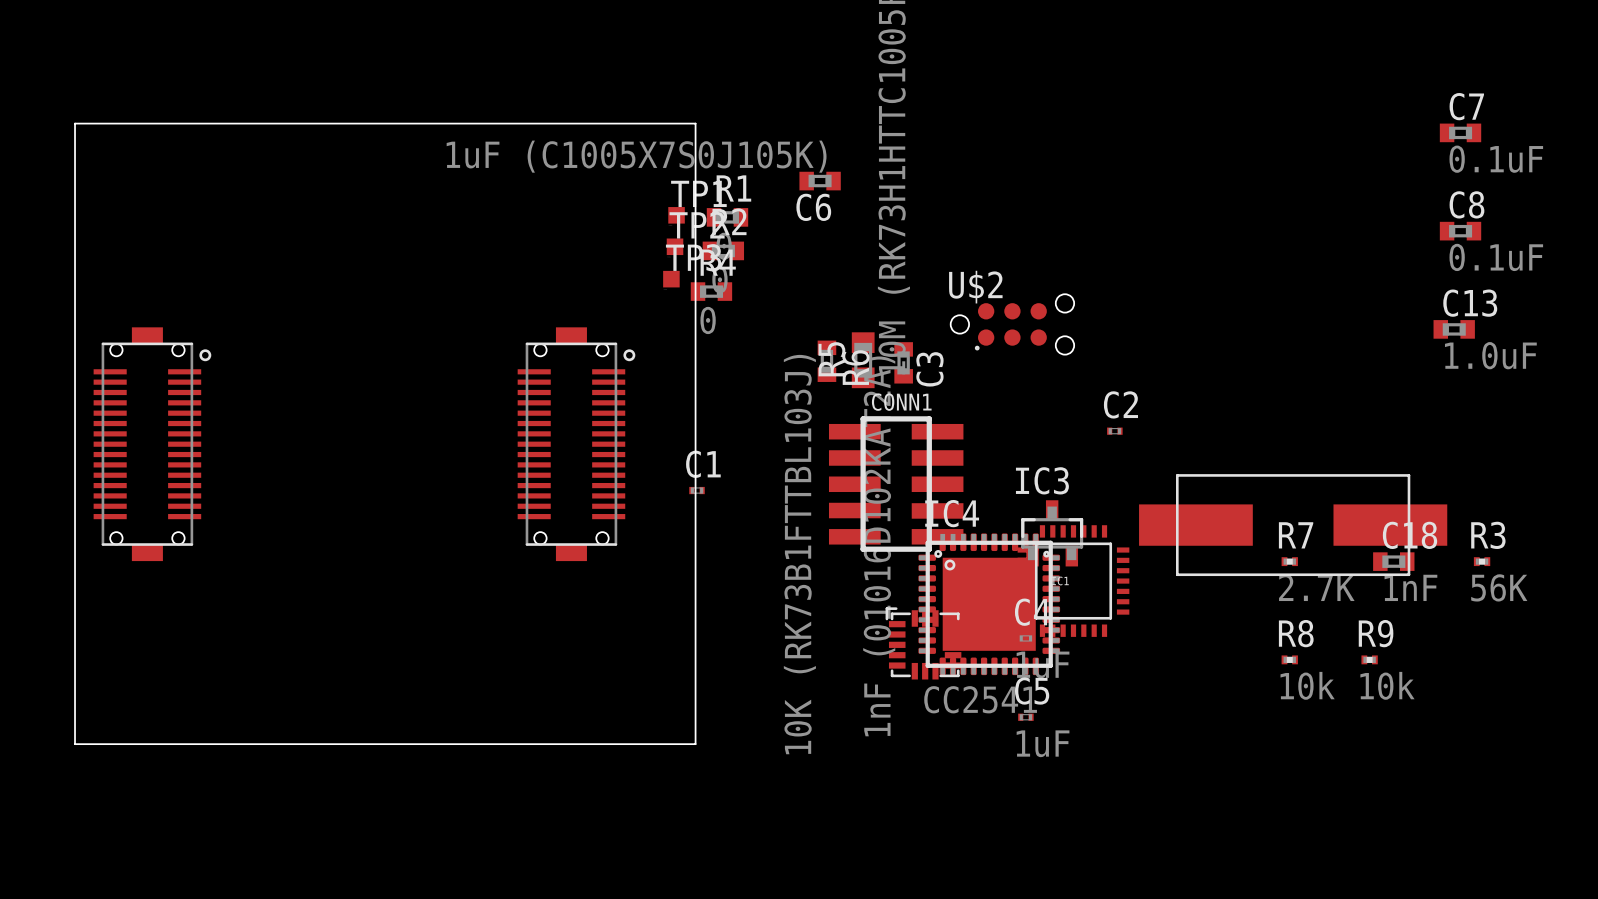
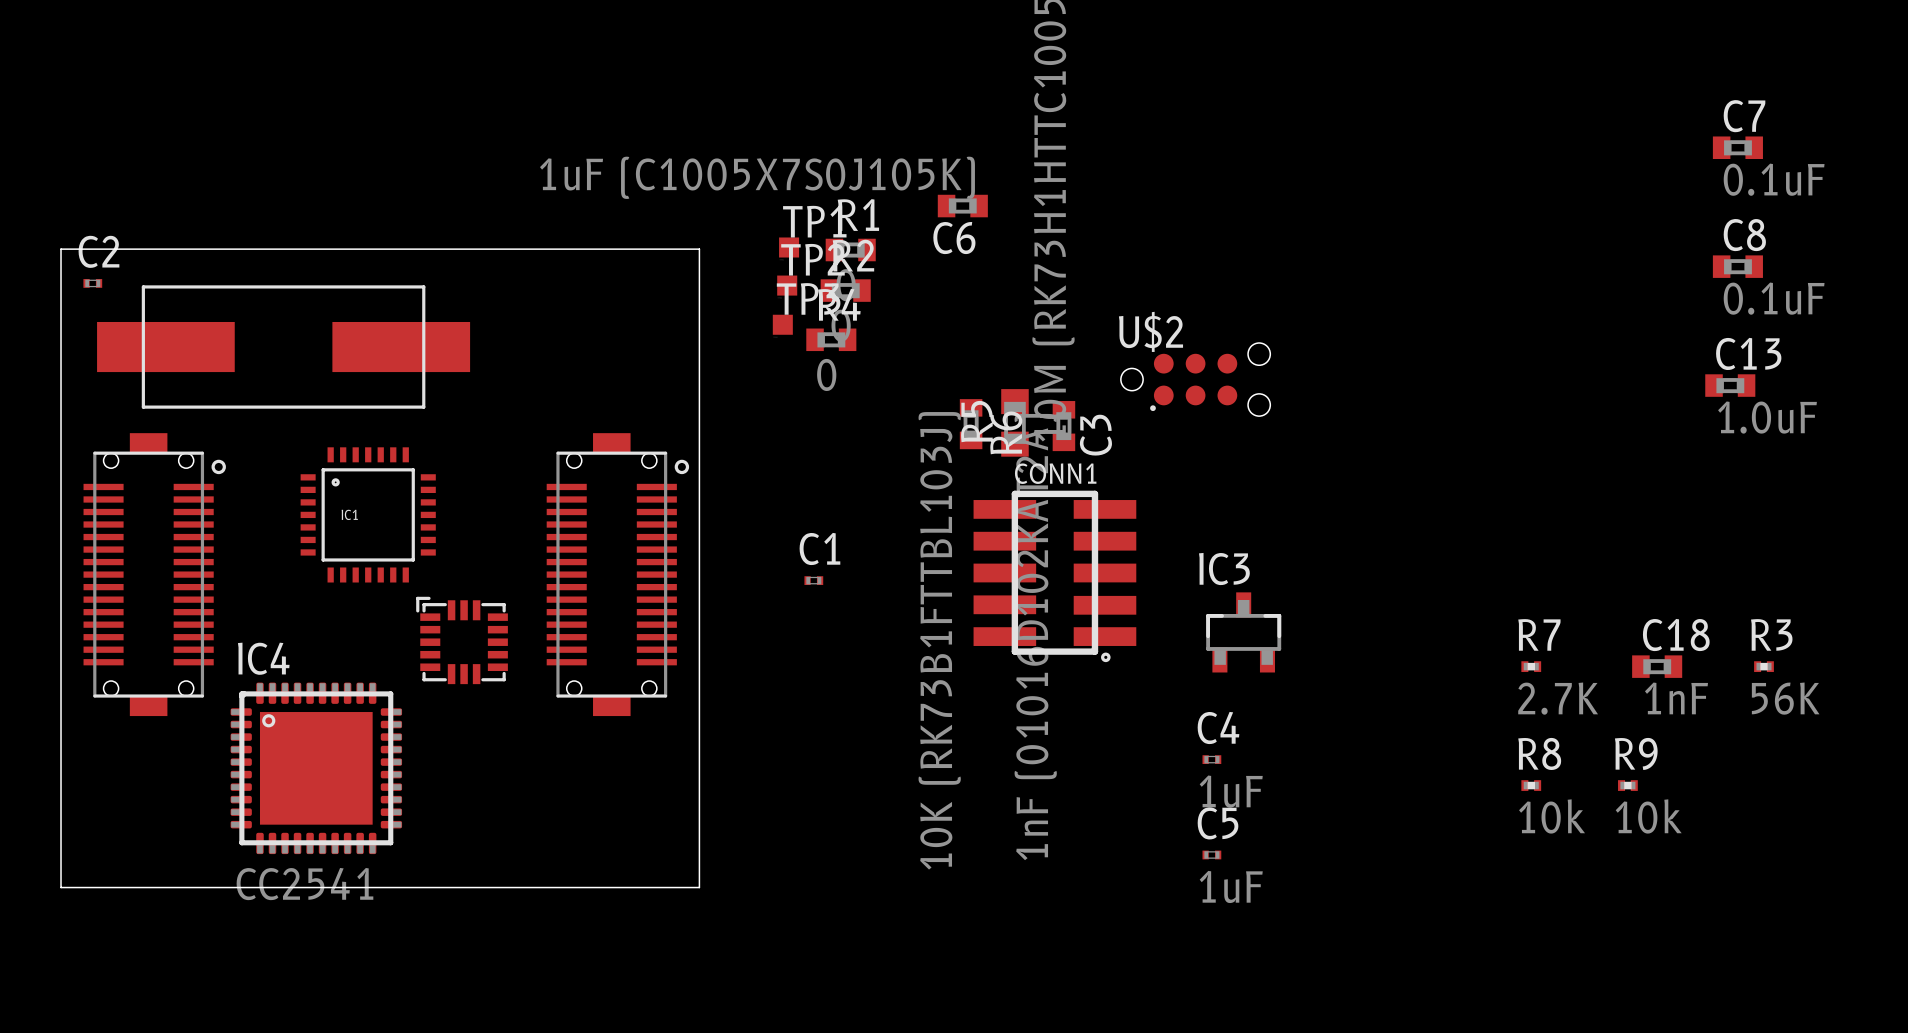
board edge: (75, 216) (75, 123) (695, 123) (695, 744) (602, 744) -> (61, 249) (699, 249) (699, 887)
part: none -> (283, 347)
C2 position: (1114, 431) -> (92, 283)
part position: (152, 444) -> (154, 574)
part position: (576, 444) -> (617, 574)
part: (1293, 525) -> none
part: none -> (462, 640)
IC1 position: (1073, 581) -> (368, 514)
IC4 position: (989, 604) -> (316, 768)
part: (923, 643) -> none

